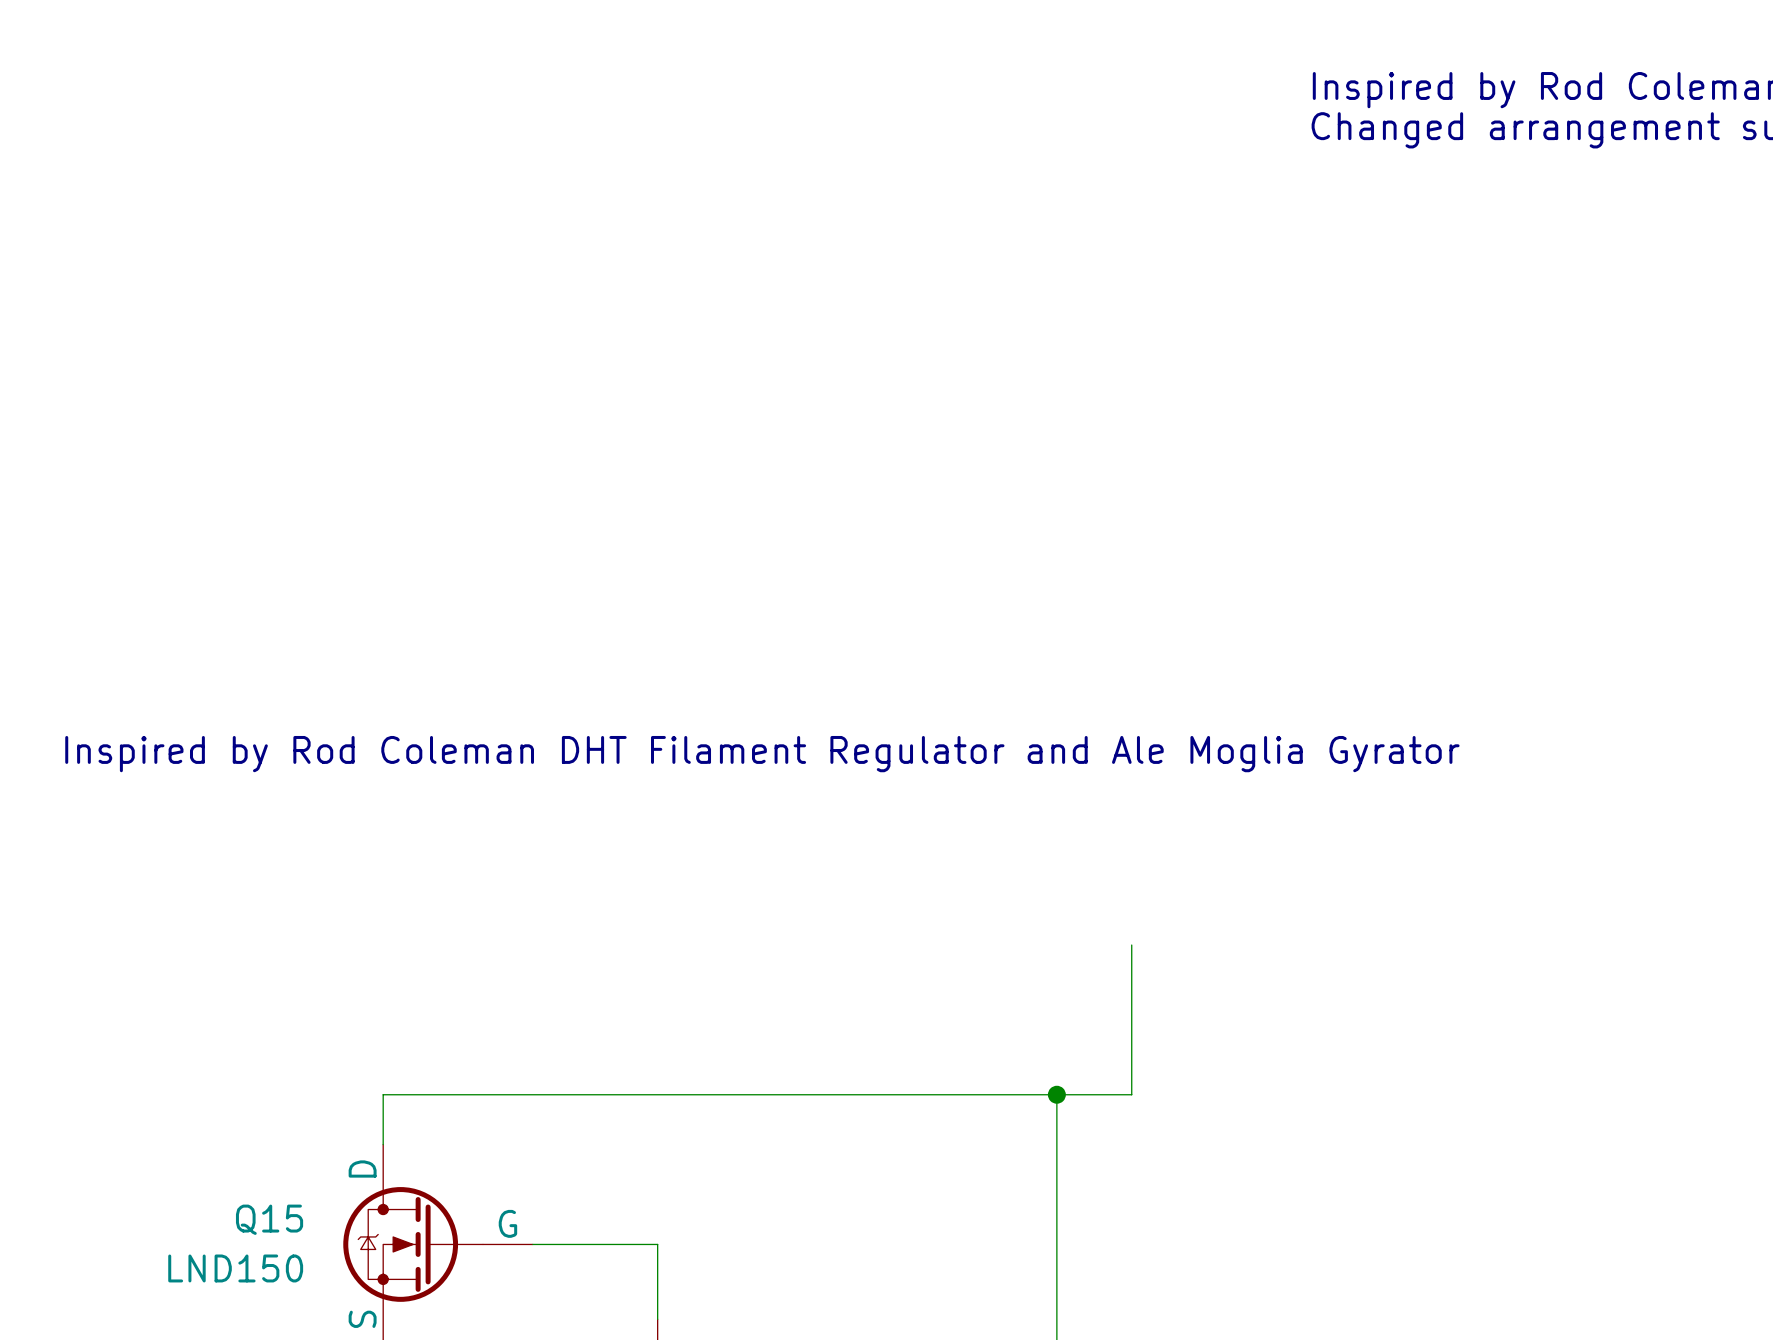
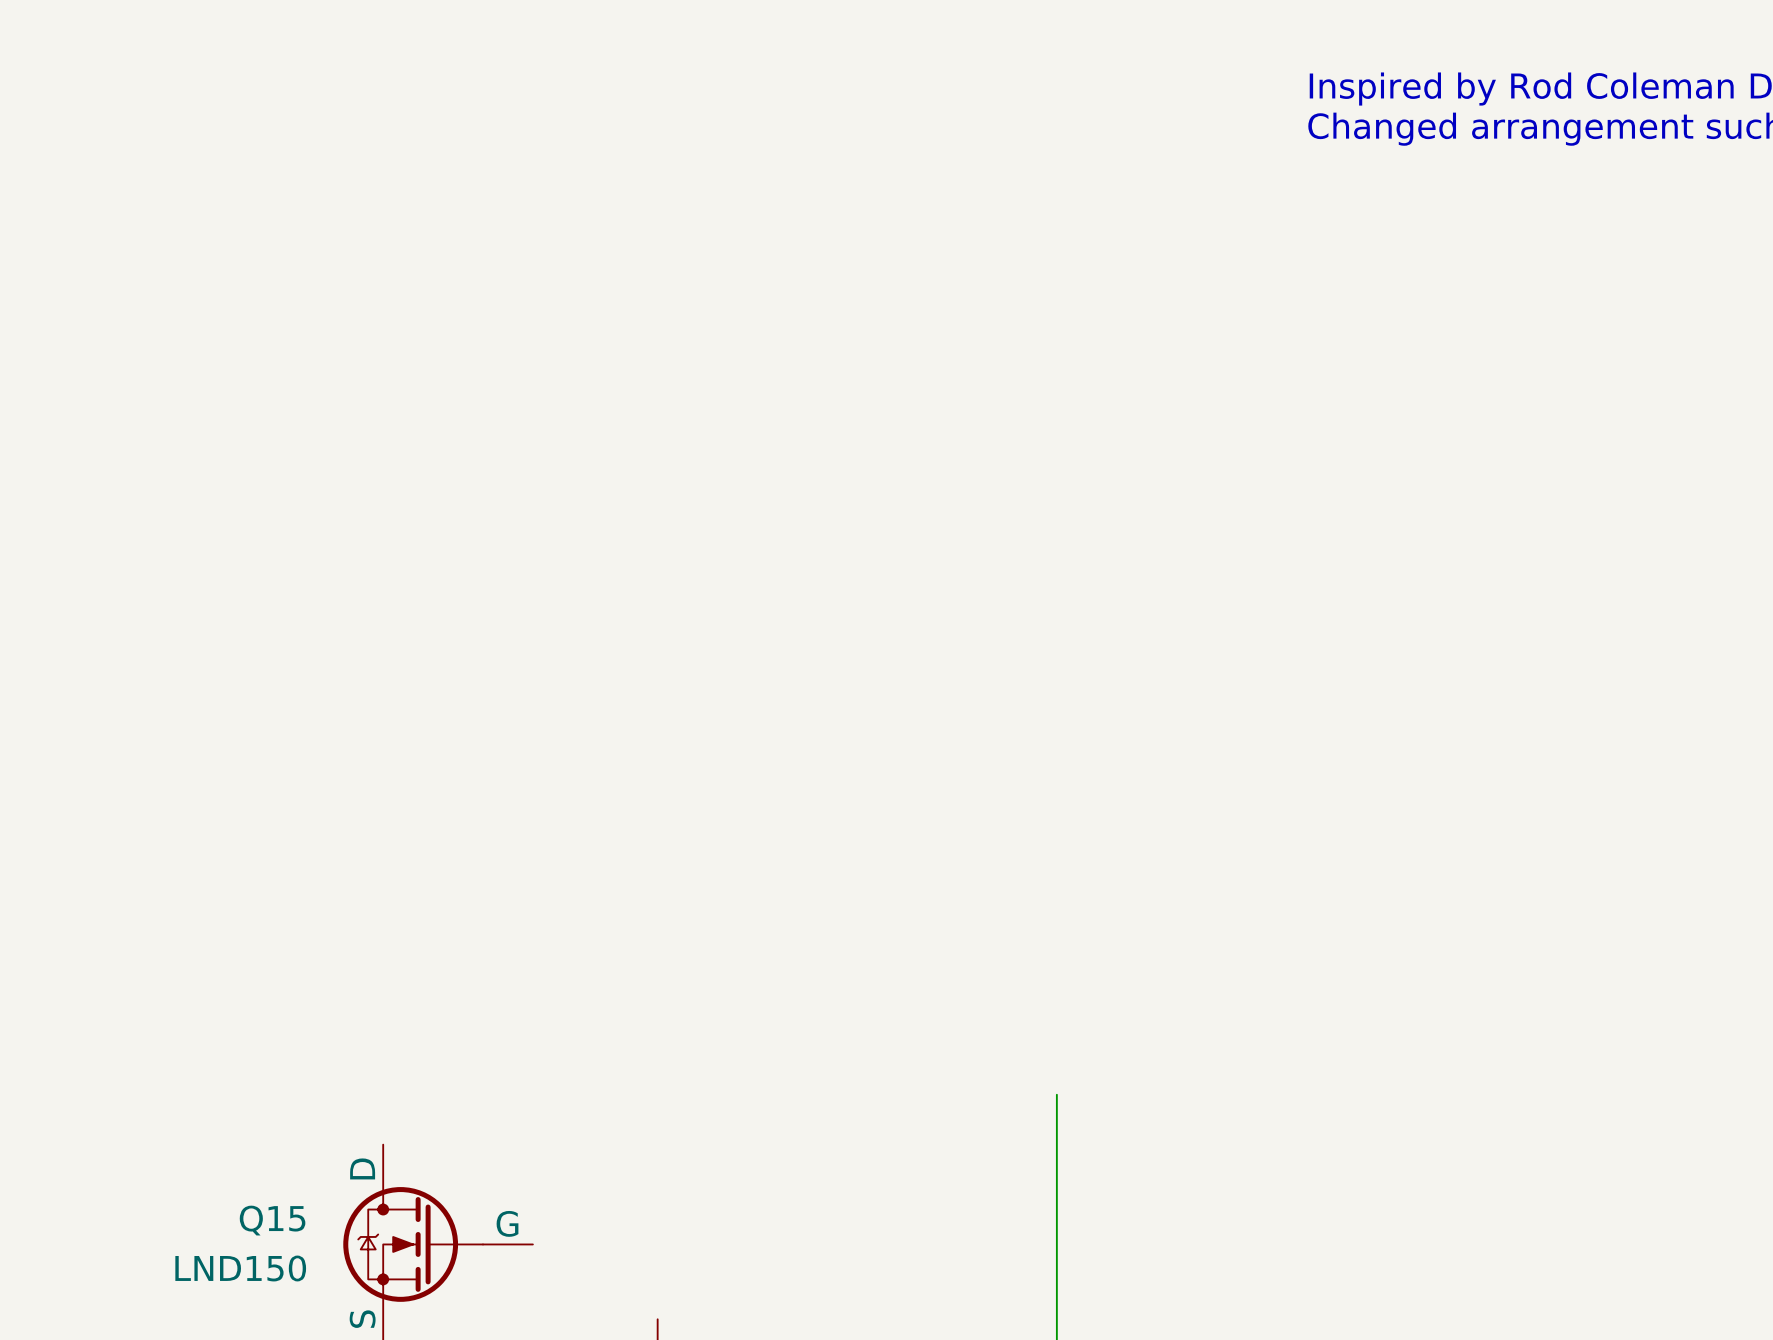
text: Inspired by Rod Coleman DHT Filament Regulator and Ale Moglia Gyrator (762, 754) -> none
wire: (1131, 945) (1131, 1094) (383, 1094) (383, 1144) -> none
junction: (1056, 1094) -> none
wire: (532, 1244) (657, 1244) (657, 1319) -> none

